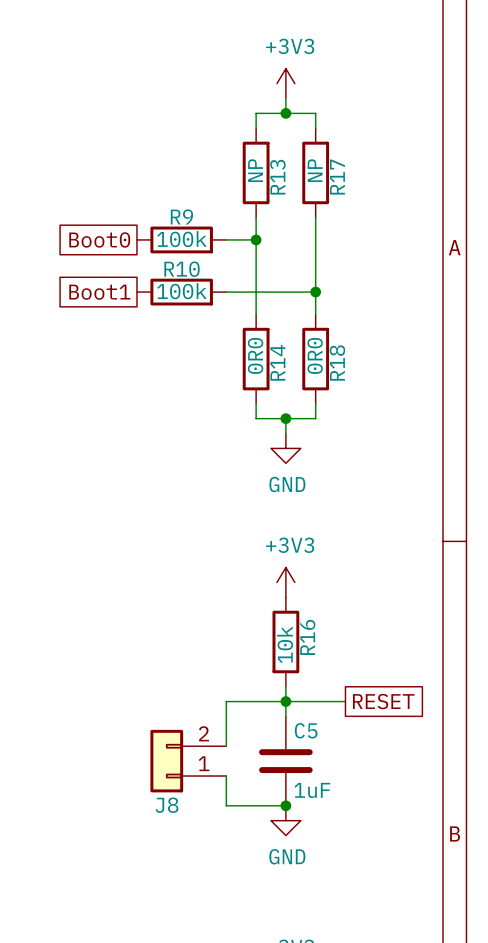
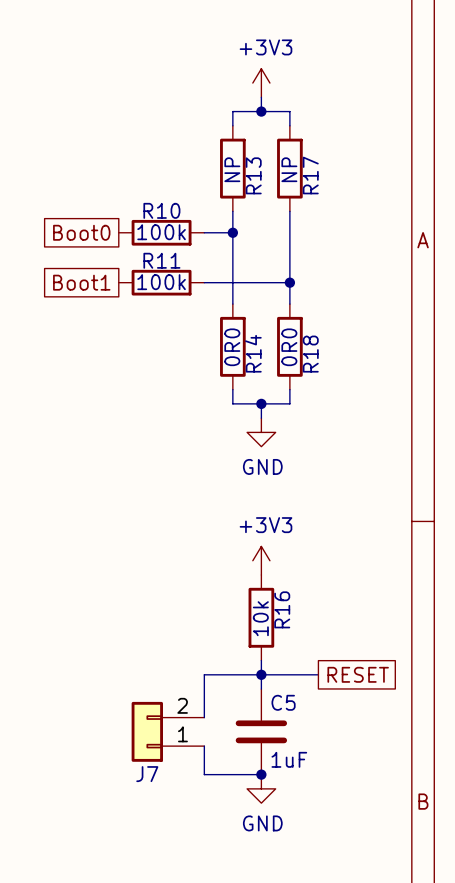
R9 name: R9 (181, 216) -> R10 (161, 210)
R10 name: R10 (182, 269) -> R11 (161, 260)
J8 name: J8 (166, 805) -> J7 (147, 774)

